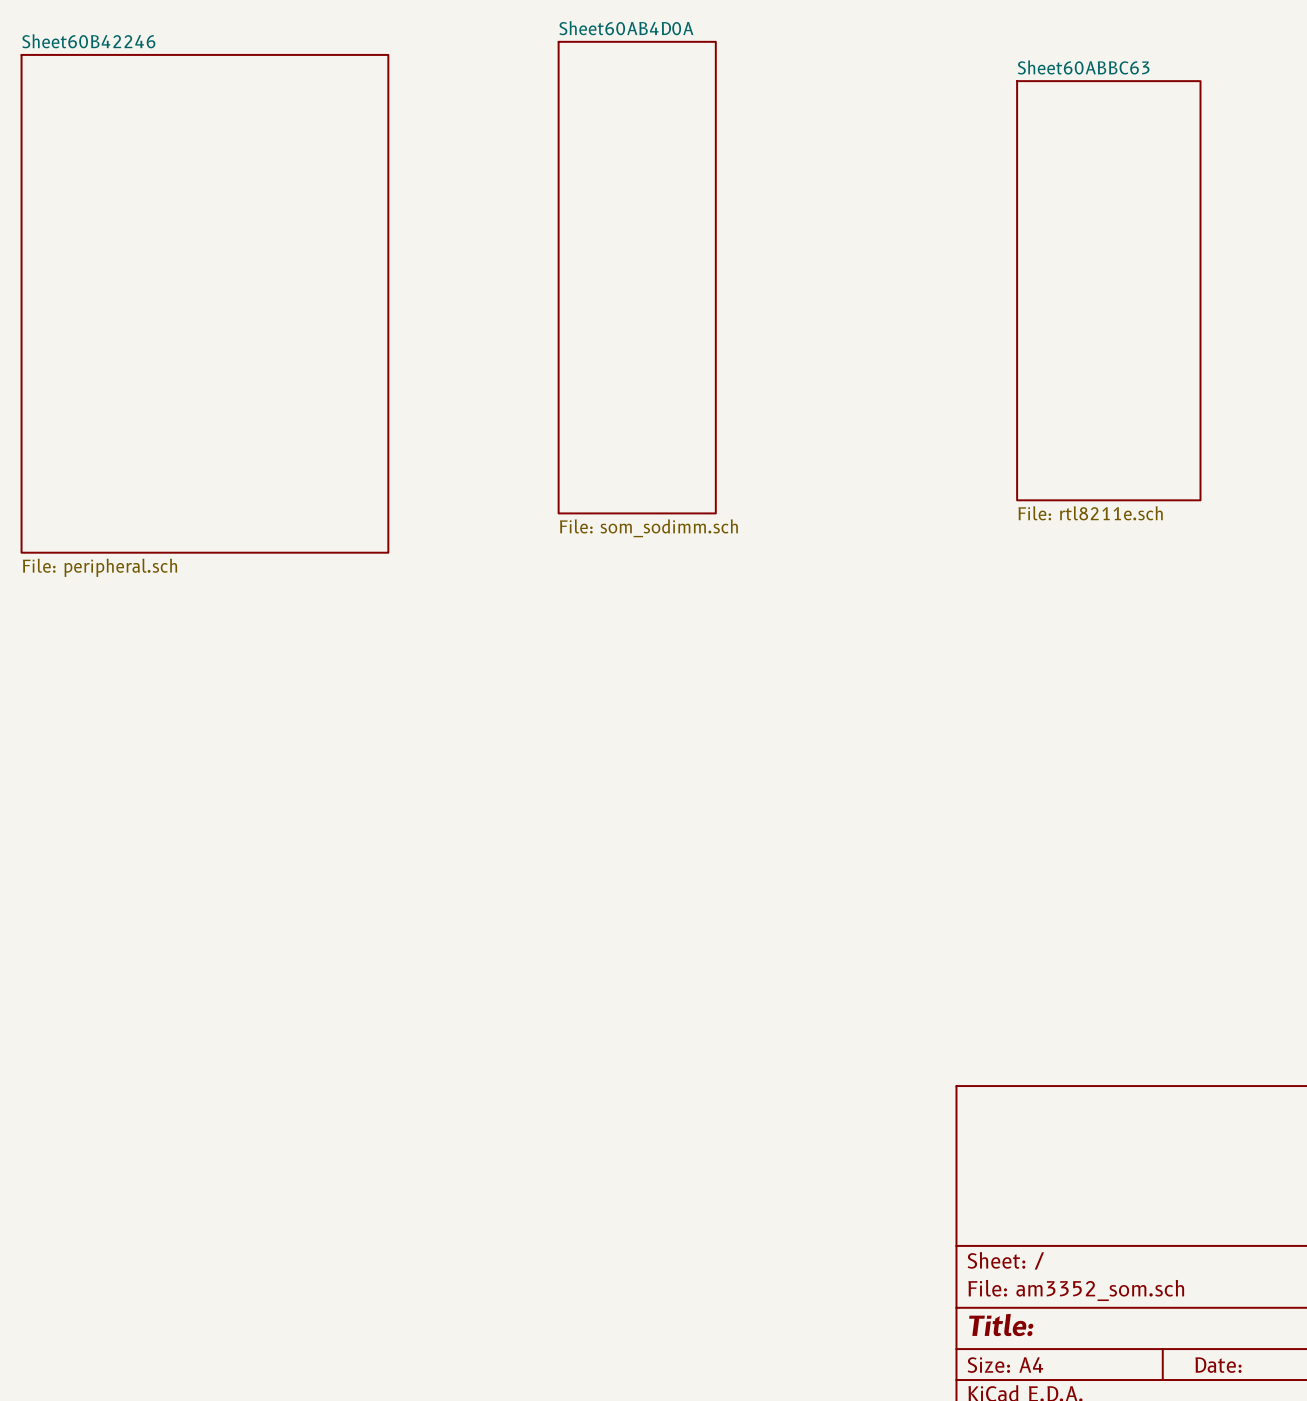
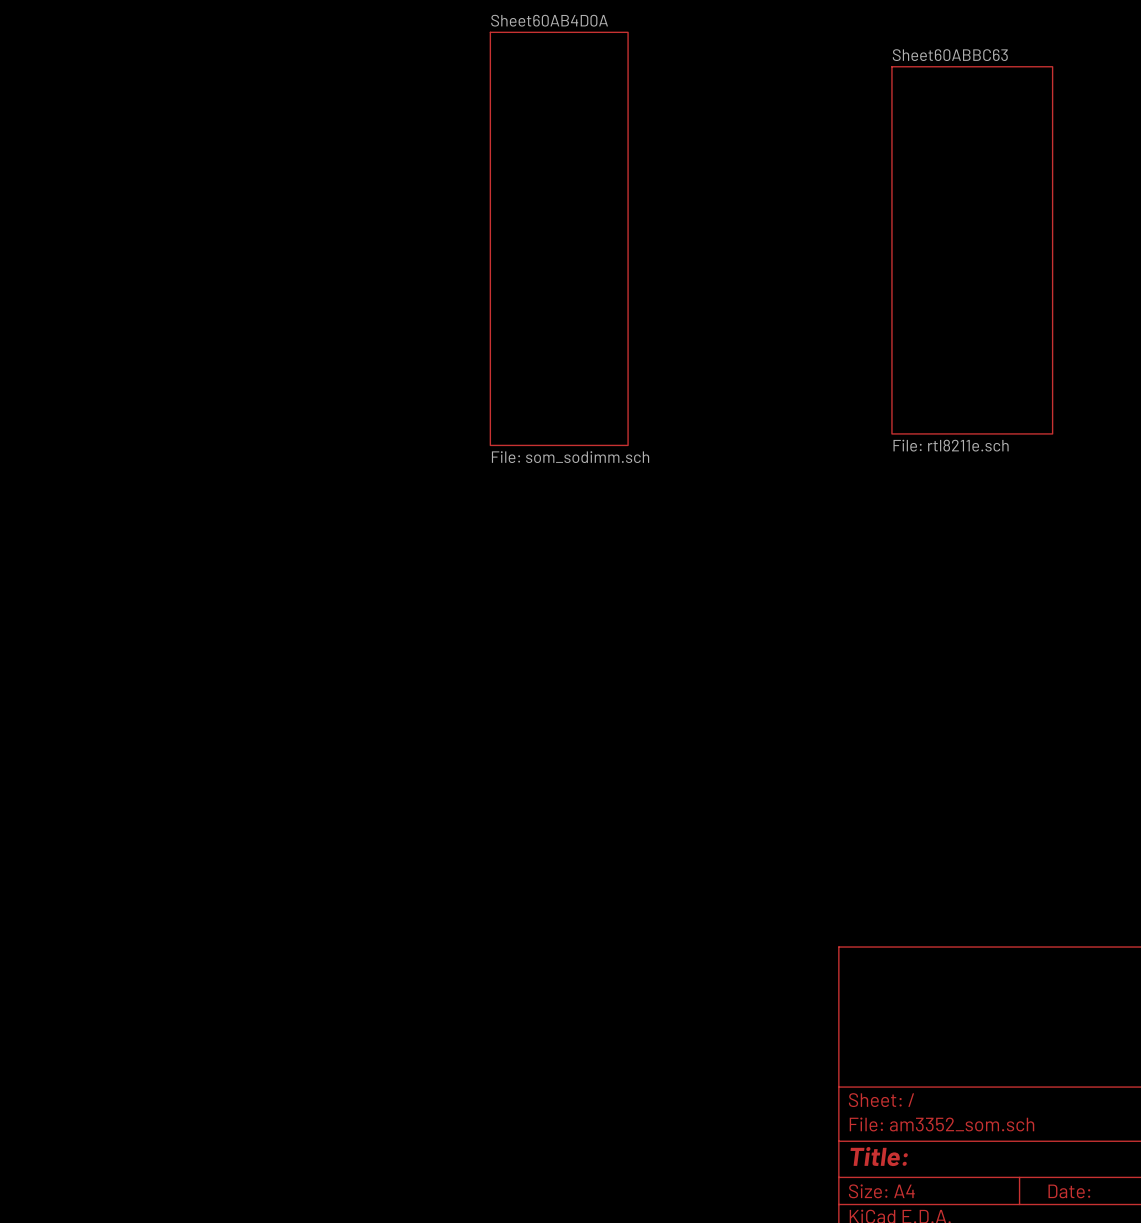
sheet Sheet60B42246: File: peripheral.sch (204, 303) -> none

